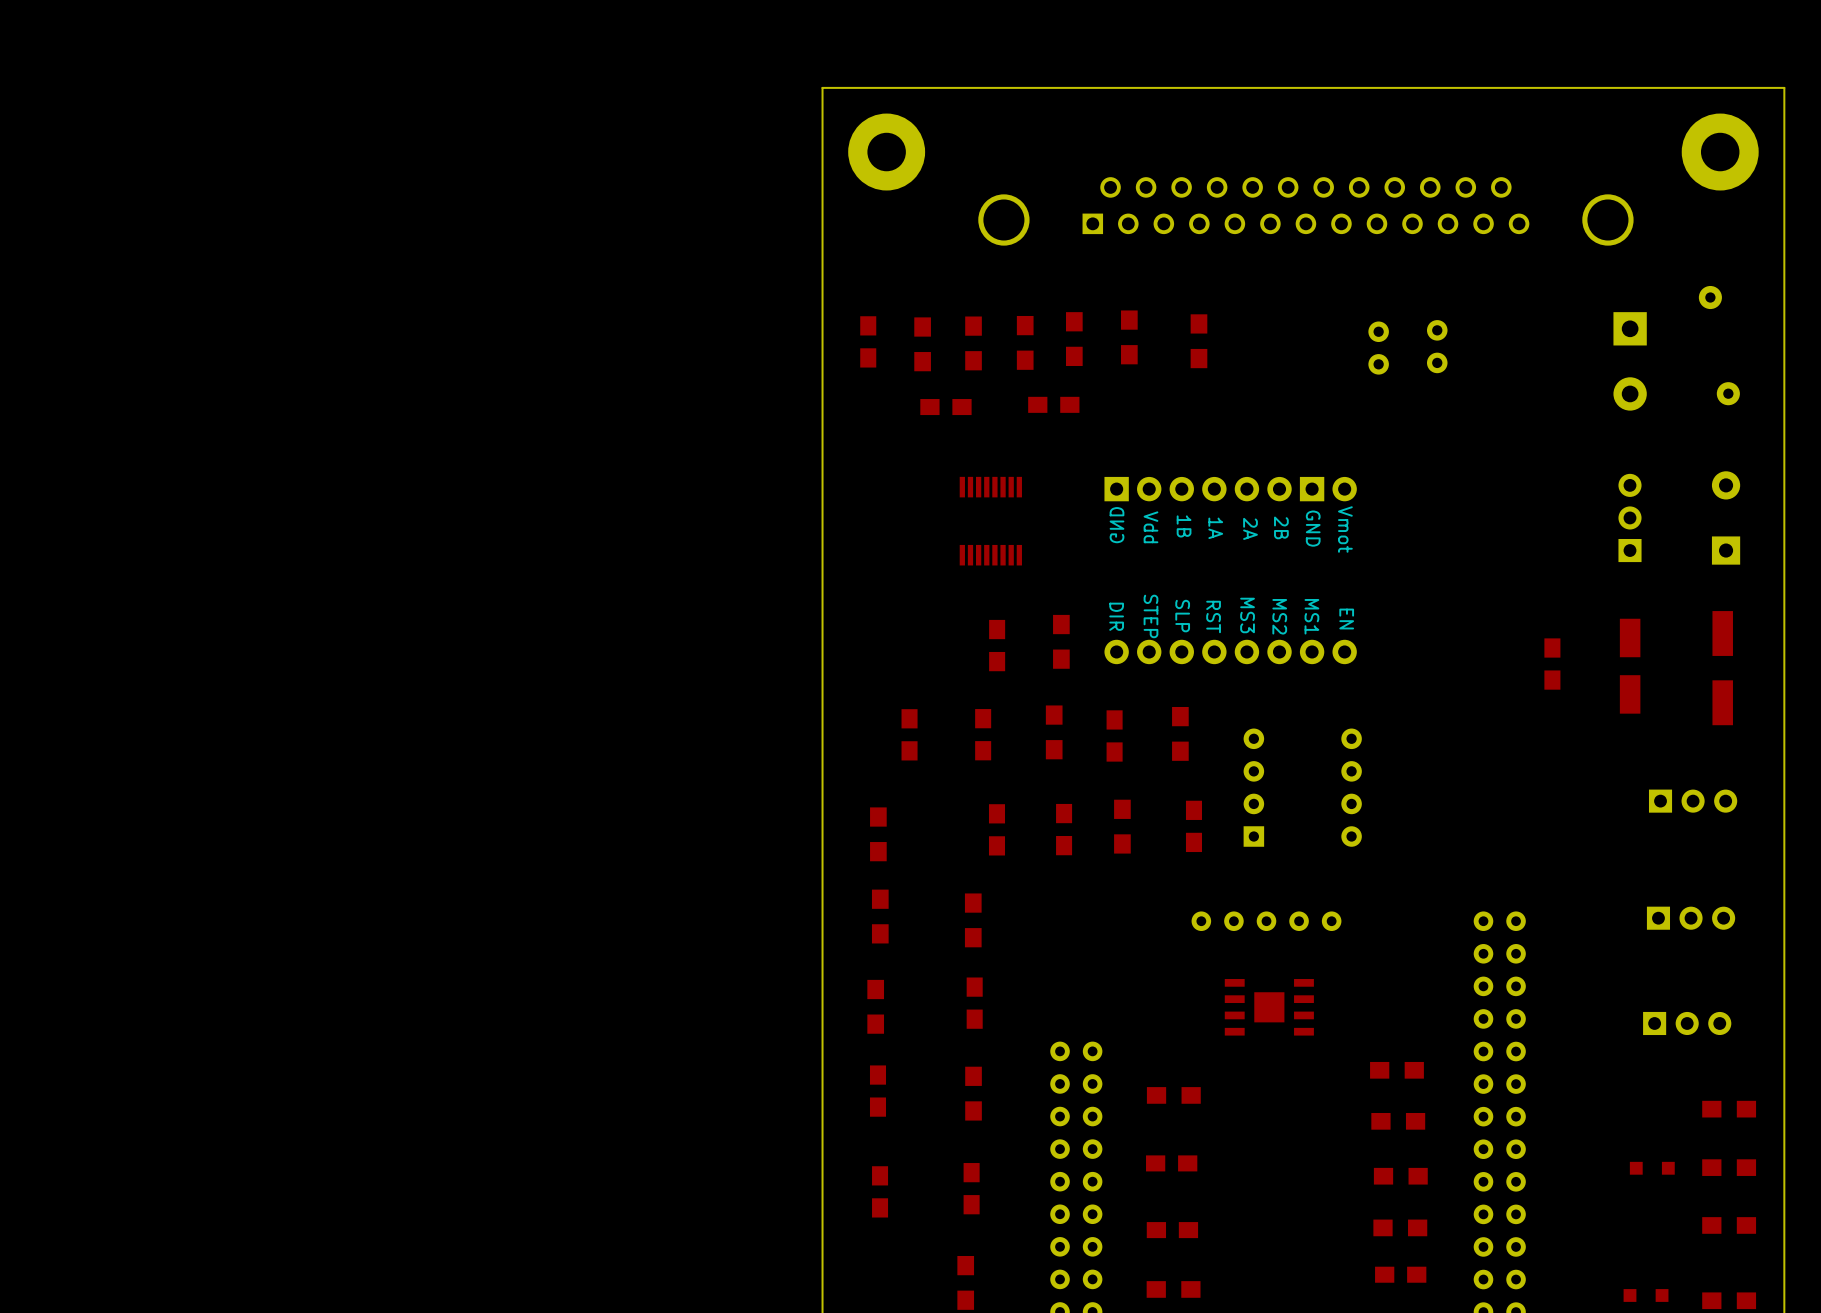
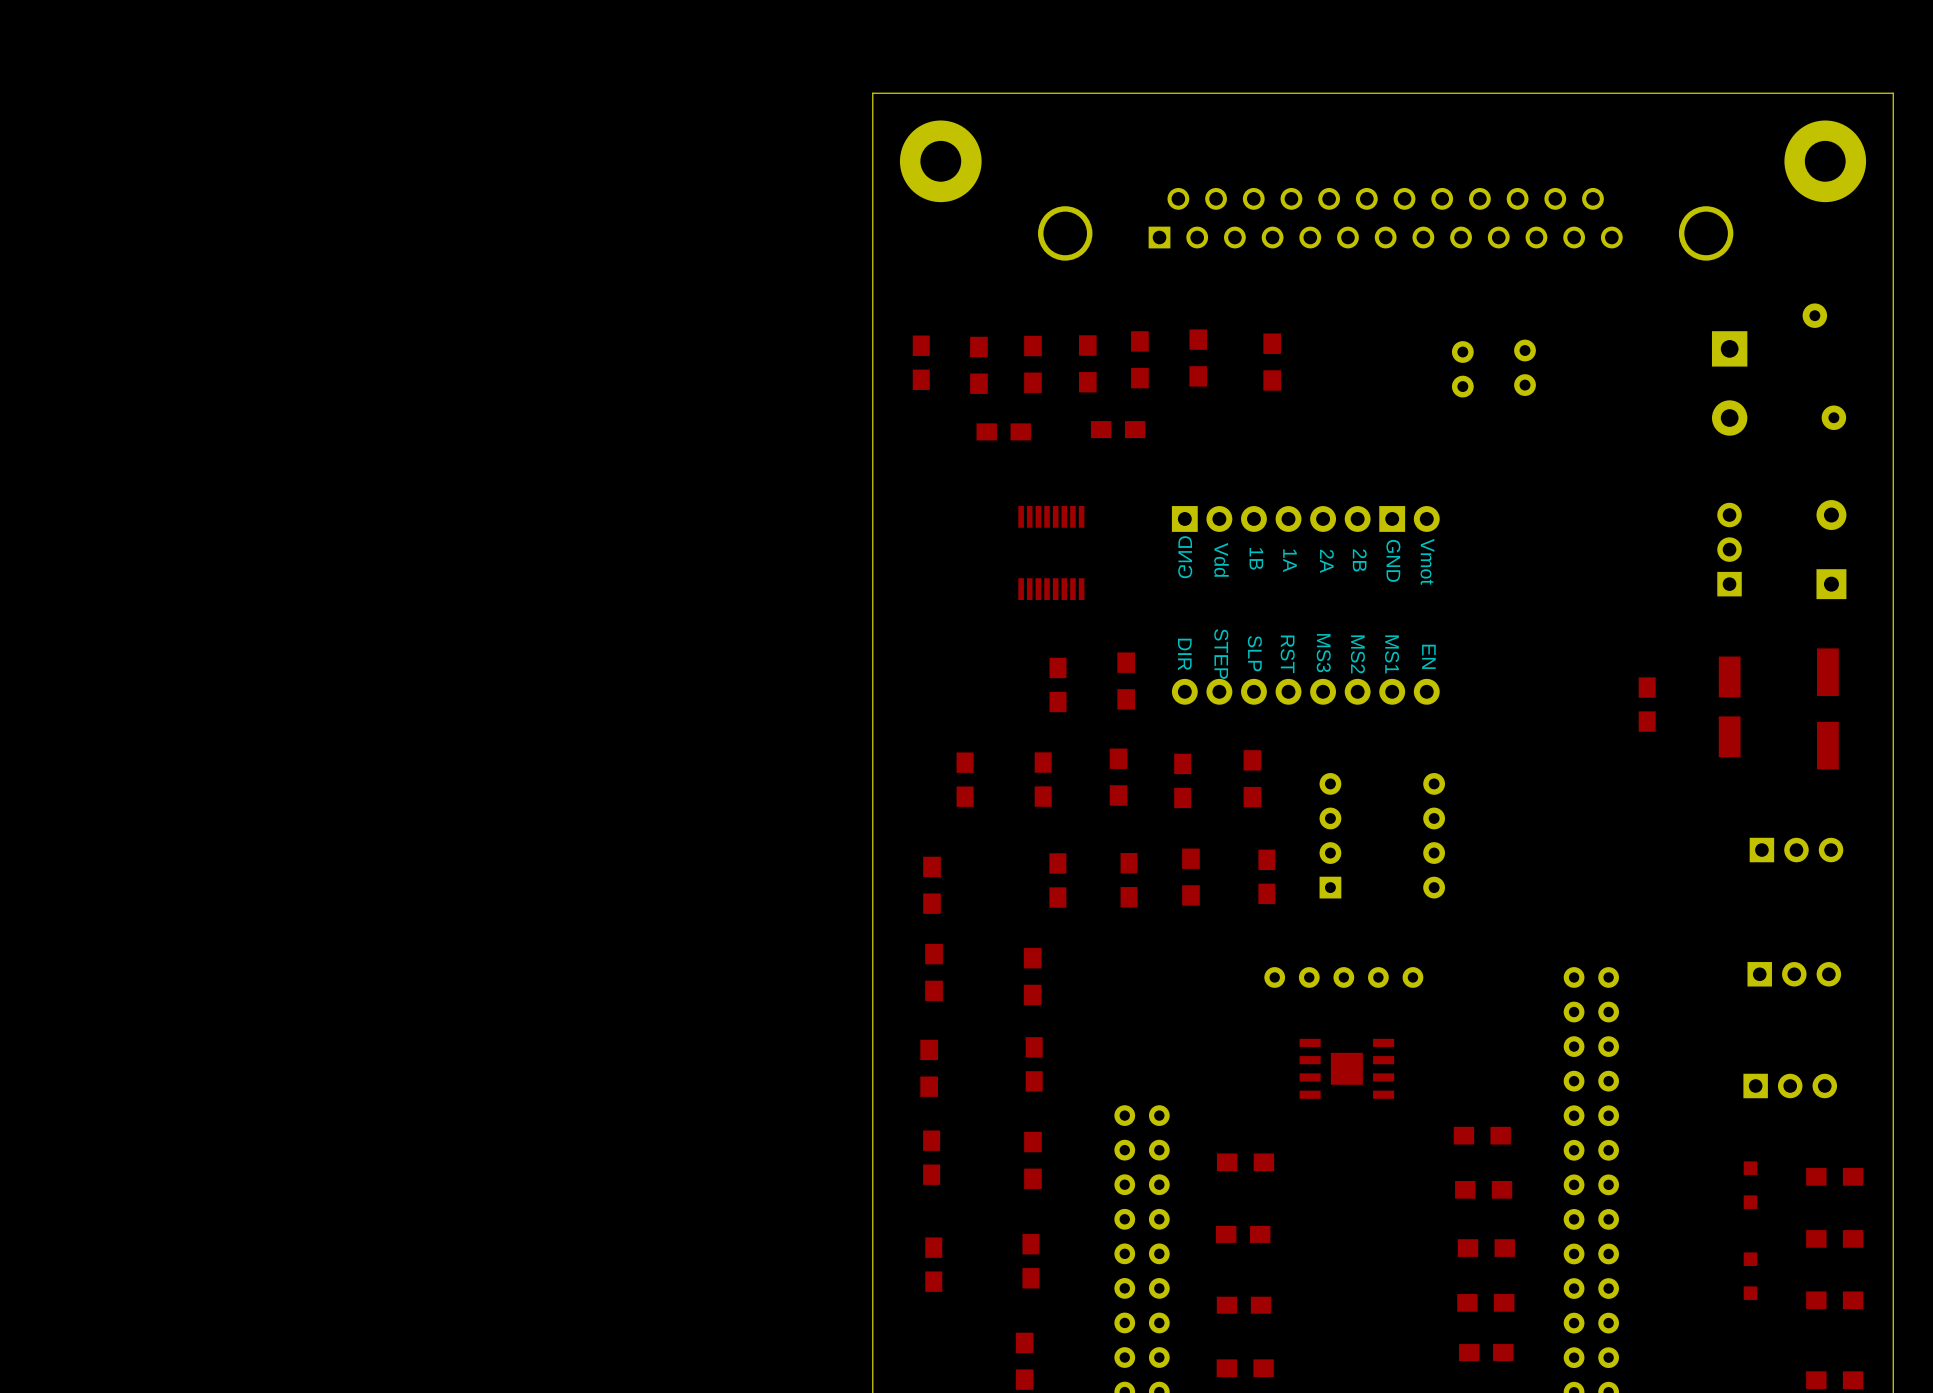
part: none -> (1750, 1185)
part: (1652, 1168) -> none
part: none -> (1750, 1276)
part: (1646, 1295) -> none

